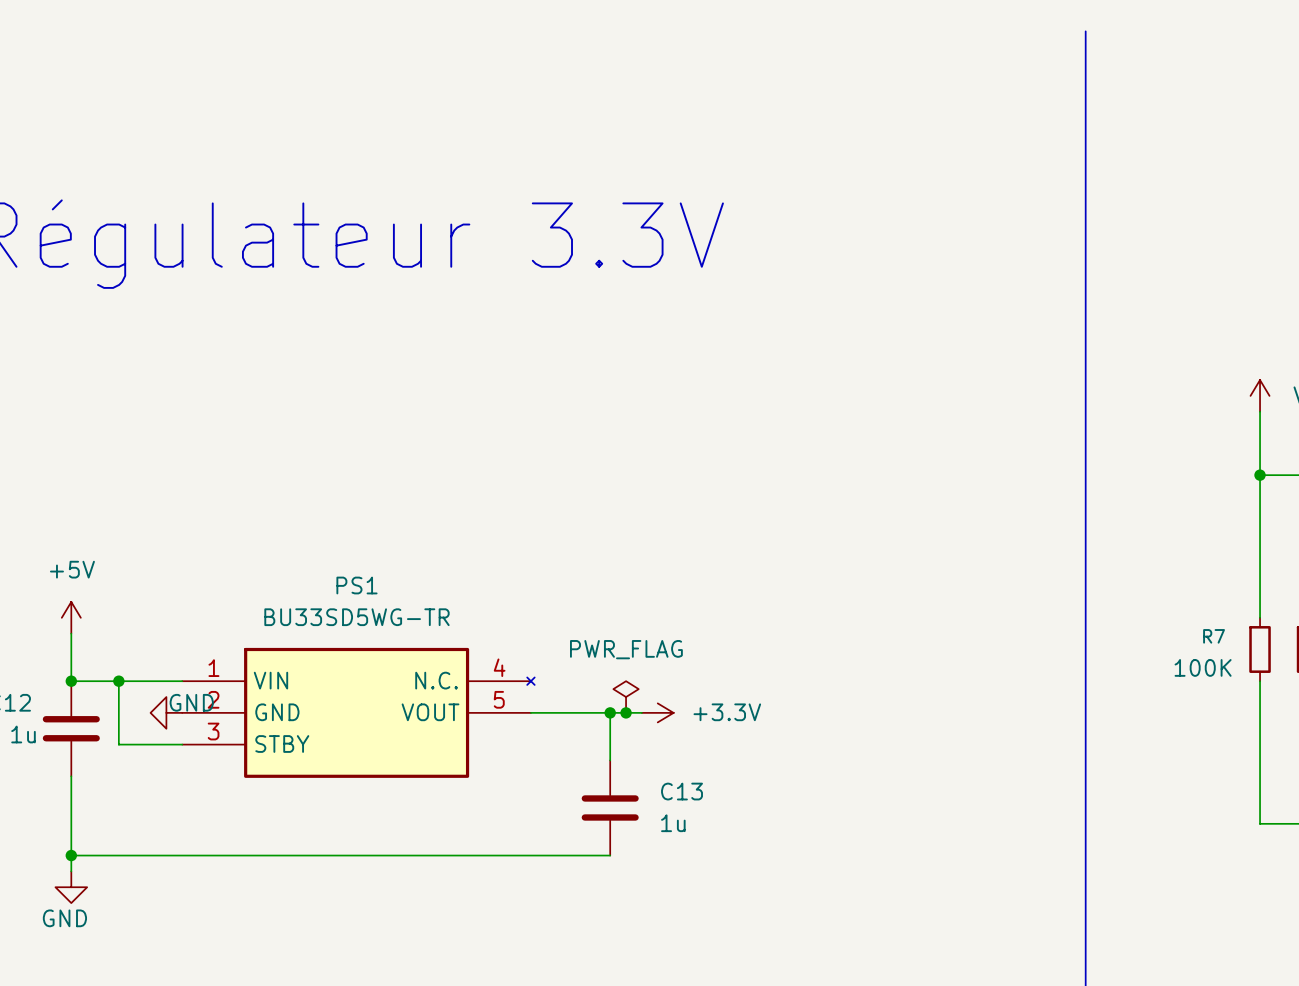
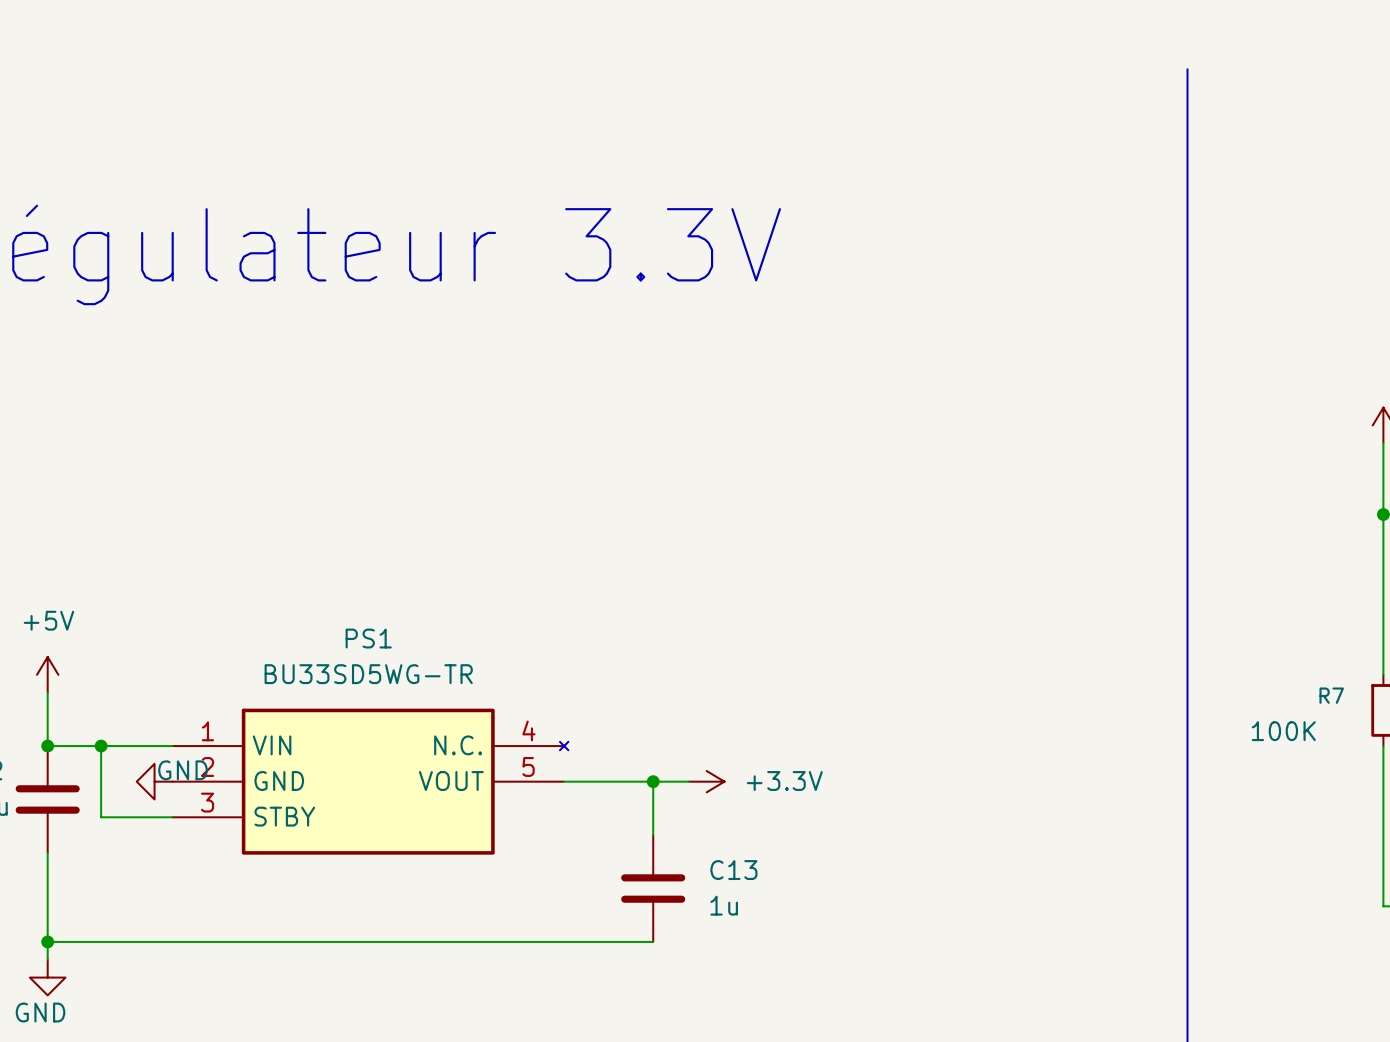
bus: (1085, 31) (1085, 78) -> none
R7 value position: 100K (1203, 667) -> 100K (1283, 731)
power symbol: PWR_FLAG (626, 697) -> none
junction: (626, 712) -> none

